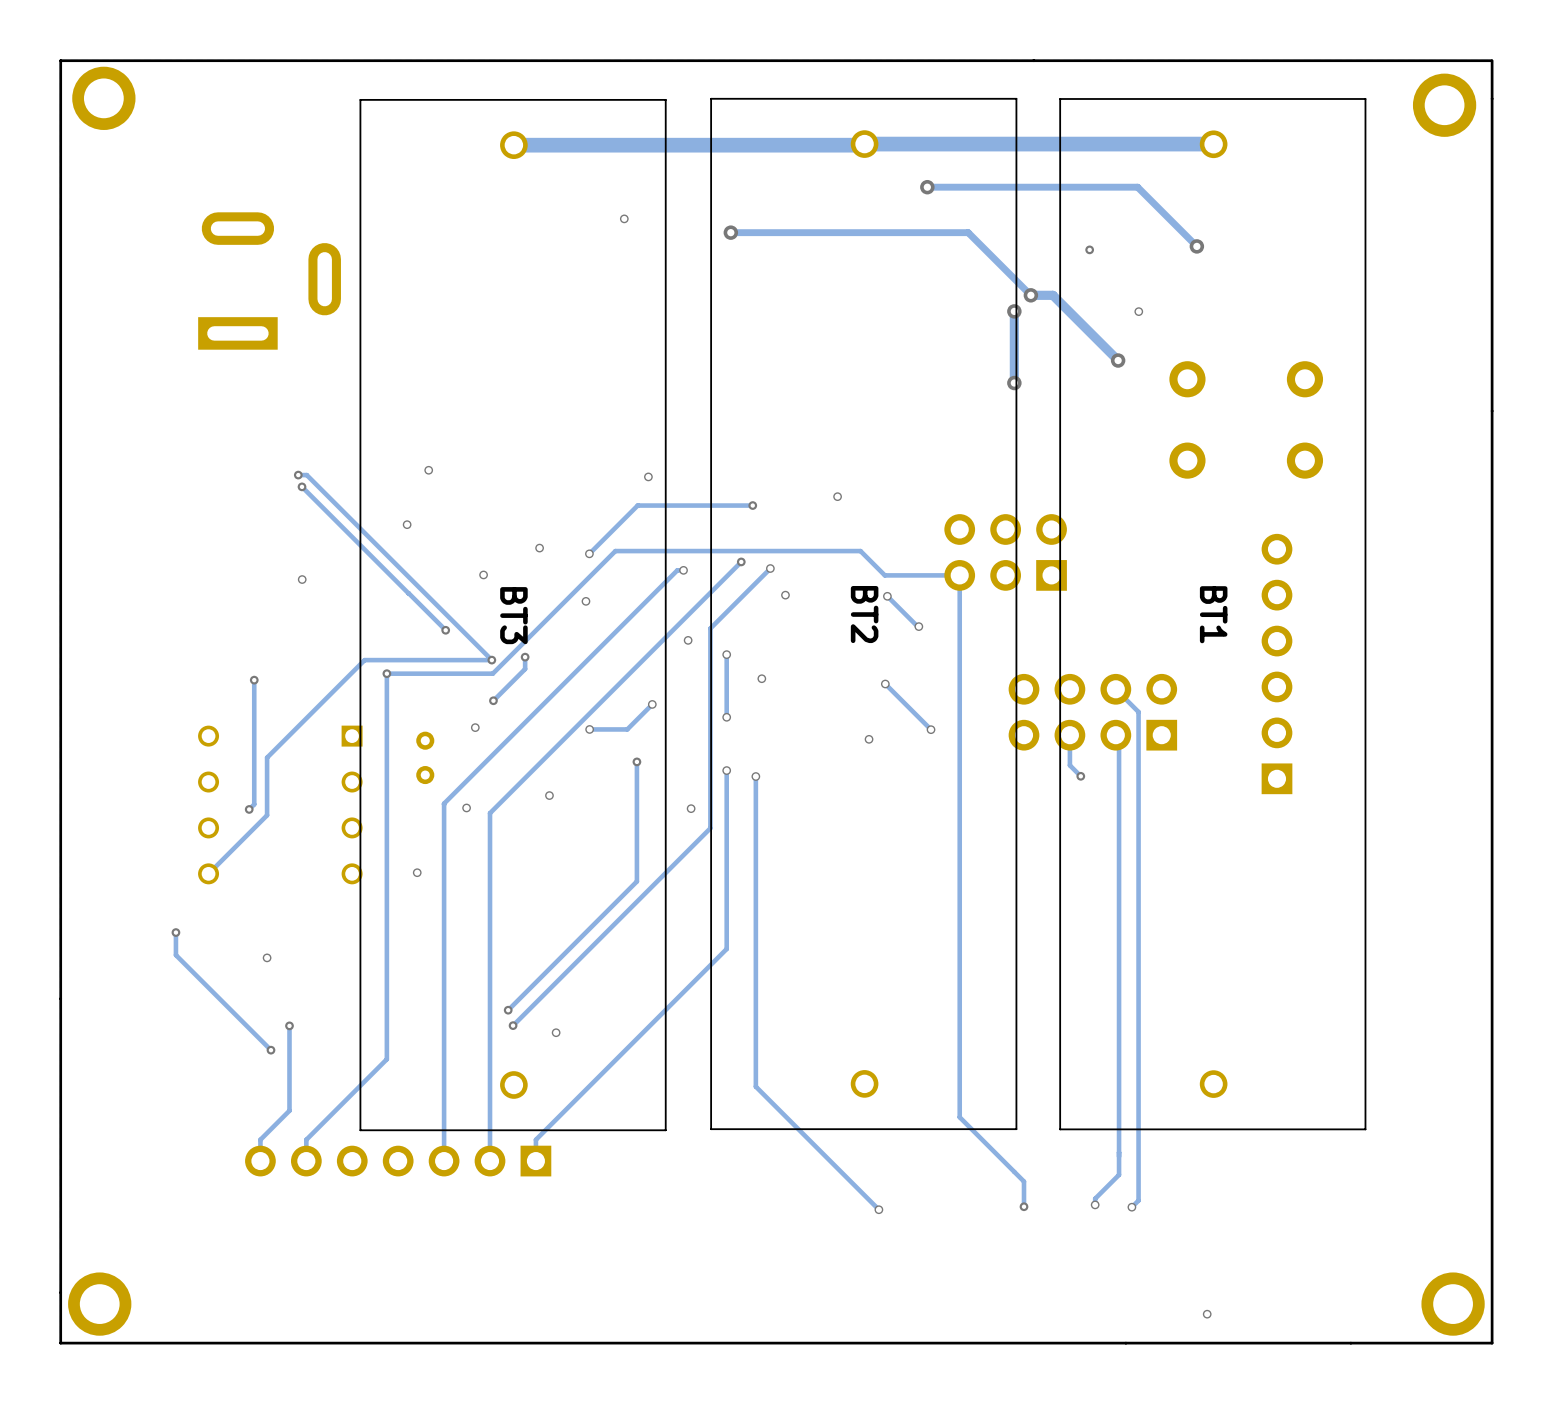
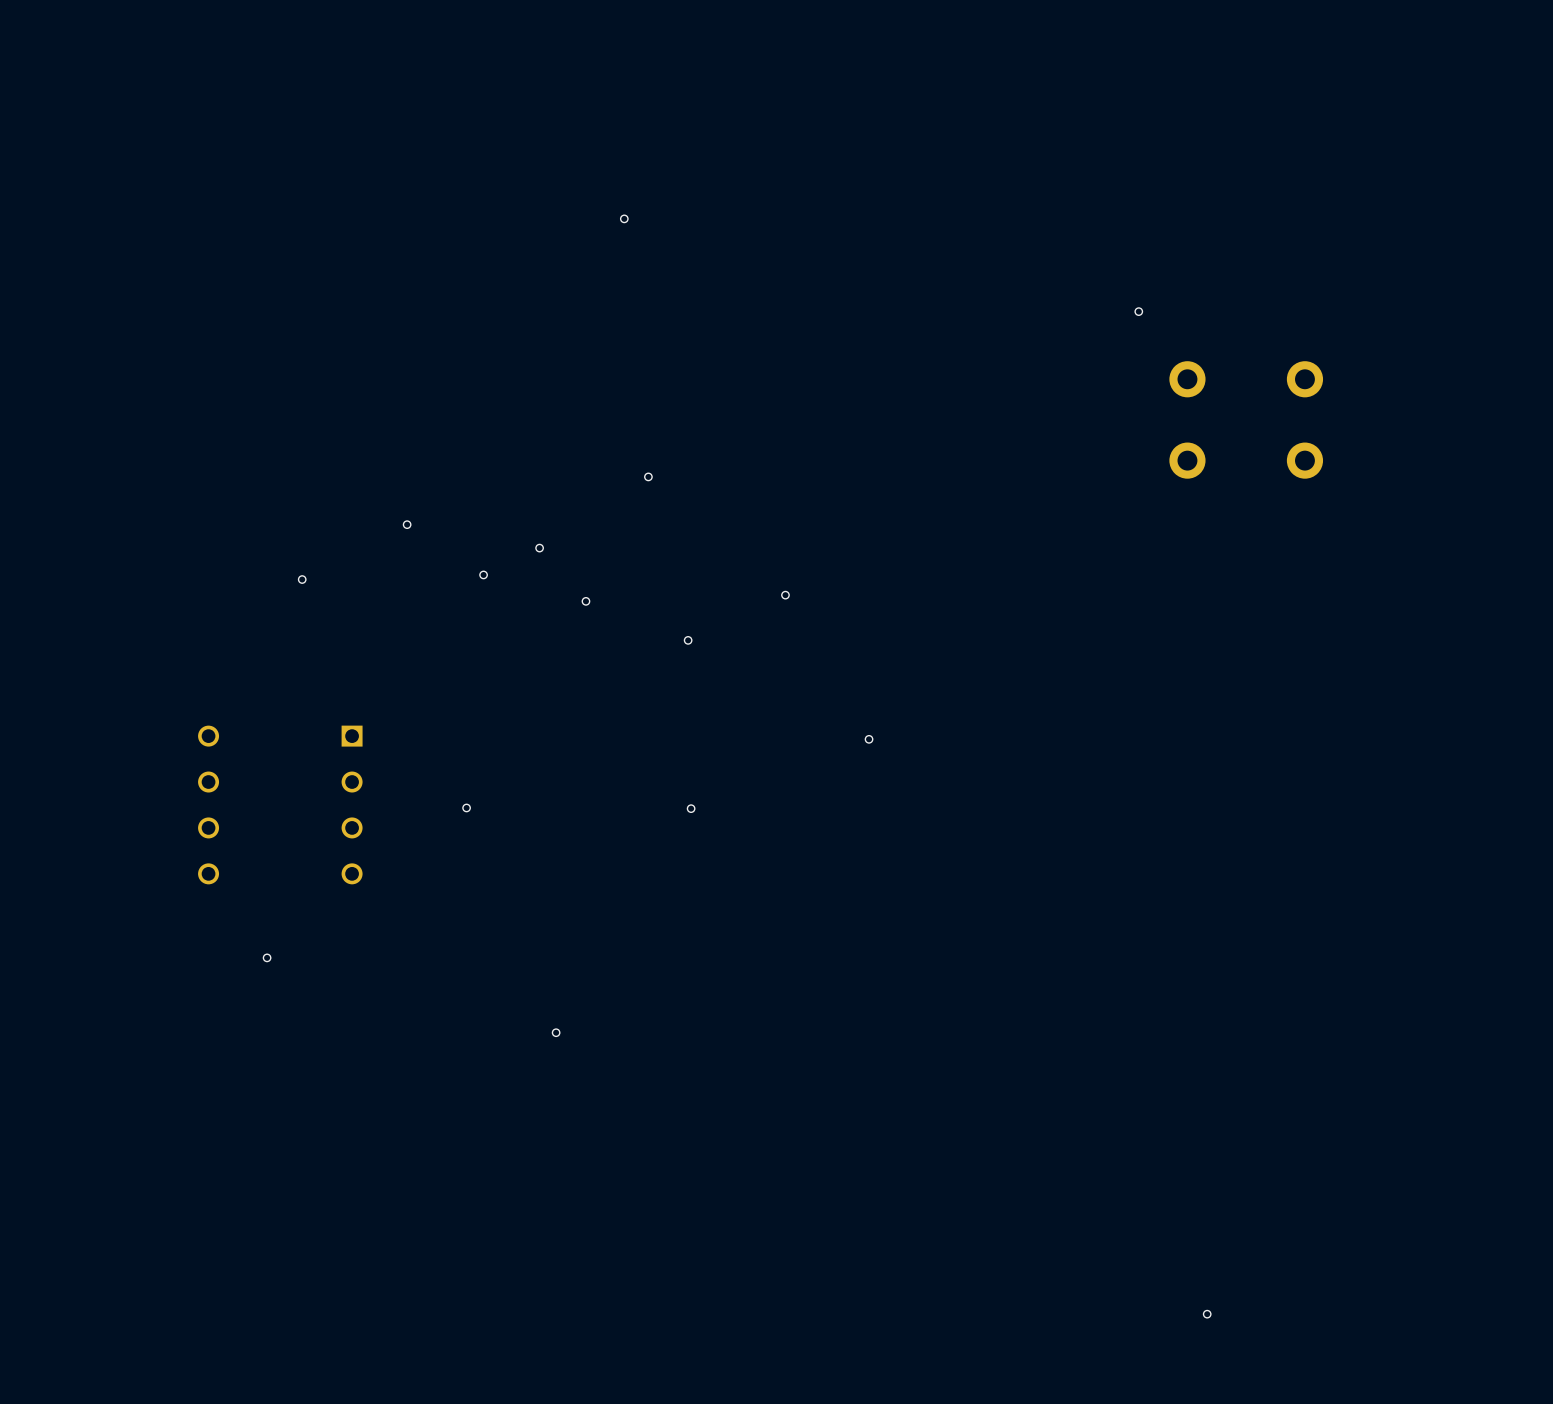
board edge: (1491, 60) (60, 60) (60, 1343) (1492, 1343) (1492, 60) -> none
part: (103, 98) -> none
part: (1444, 105) -> none
track: (1213, 144) (513, 145) -> none
track: (927, 187) (1137, 187) (1196, 246) -> none
via: (927, 187) -> none
track: (730, 232) (968, 232) (1030, 295) (1052, 295) (1118, 360) -> none
via: (730, 232) -> none
via: (1196, 246) -> none
via: (1089, 249) -> none
part: (269, 281) -> none
via: (1030, 295) -> none
track: (1014, 311) (1014, 383) -> none
via: (1014, 311) -> none
via: (1118, 360) -> none
via: (1014, 383) -> none
via: (428, 470) -> none
track: (298, 475) (306, 475) (491, 660) (364, 660) (267, 757) (267, 815) (208, 873) -> none
via: (298, 475) -> none
track: (302, 486) (408, 593) -> none
via: (302, 486) -> none
via: (837, 496) -> none
track: (752, 505) (637, 505) (589, 553) -> none
via: (752, 505) -> none
part: (1005, 552) -> none
via: (589, 553) -> none
track: (741, 561) (490, 813) (490, 1161) -> none
via: (741, 561) -> none
track: (770, 568) (710, 628) (710, 828) (513, 1025) -> none
via: (770, 568) -> none
track: (683, 570) (677, 570) (444, 803) (444, 1161) -> none
via: (683, 570) -> none
track: (408, 593) (445, 630) -> none
track: (887, 596) (918, 626) -> none
via: (887, 596) -> none
BT2: (863, 613) -> none
BT1: (1212, 614) -> none
BT3: (513, 615) -> none
via: (918, 626) -> none
via: (445, 630) -> none
track: (726, 654) (726, 717) -> none
via: (726, 654) -> none
track: (525, 657) (525, 669) (493, 700) -> none
via: (525, 657) -> none
via: (491, 660) -> none
part: (1276, 664) -> none
via: (386, 673) -> none
via: (761, 678) -> none
track: (254, 680) (254, 804) (249, 809) -> none
via: (254, 680) -> none
track: (885, 684) (931, 729) -> none
via: (885, 684) -> none
track: (1115, 689) (1138, 712) (1138, 1200) (1131, 1207) -> none
via: (493, 700) -> none
track: (652, 704) (627, 729) (589, 729) -> none
via: (652, 704) -> none
part: (1092, 712) -> none
via: (726, 717) -> none
via: (475, 727) -> none
via: (589, 729) -> none
via: (931, 729) -> none
track: (1119, 729) (1119, 1174) (1095, 1198) (1095, 1204) -> none
track: (1069, 735) (1069, 765) (1080, 776) -> none
part: (425, 757) -> none
track: (636, 761) (636, 881) (508, 1010) -> none
via: (636, 761) -> none
track: (726, 770) (726, 949) (535, 1139) (535, 1161) -> none
via: (726, 770) -> none
track: (755, 776) (755, 1086) (878, 1209) -> none
via: (755, 776) -> none
via: (1080, 776) -> none
via: (549, 795) -> none
via: (249, 809) -> none
via: (417, 872) -> none
track: (175, 932) (175, 955) (270, 1050) -> none
via: (175, 932) -> none
via: (508, 1010) -> none
track: (289, 1025) (289, 1110) (260, 1139) (260, 1161) -> none
via: (289, 1025) -> none
via: (513, 1025) -> none
via: (270, 1050) -> none
track: (306, 1161) (306, 1139) (386, 1059) (386, 673) (492, 673) (615, 551) (860, 551) (884, 575) (959, 575) (959, 1117) (1024, 1181) (1024, 1206) -> none
part: (398, 1161) -> none
via: (1095, 1204) -> none
via: (1024, 1206) -> none
via: (1131, 1207) -> none
via: (878, 1209) -> none
part: (99, 1304) -> none
part: (1453, 1304) -> none

